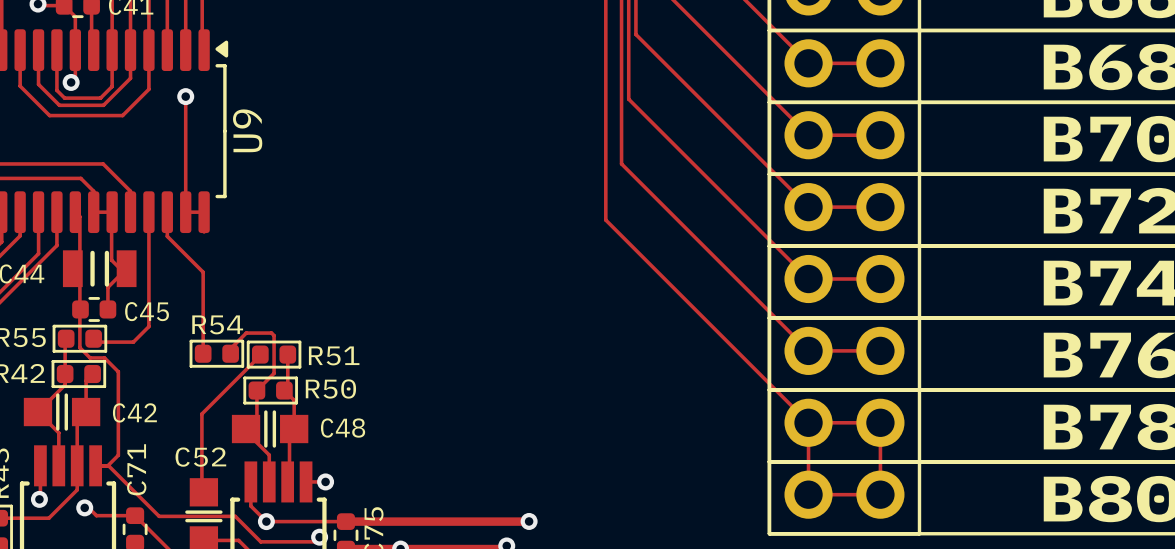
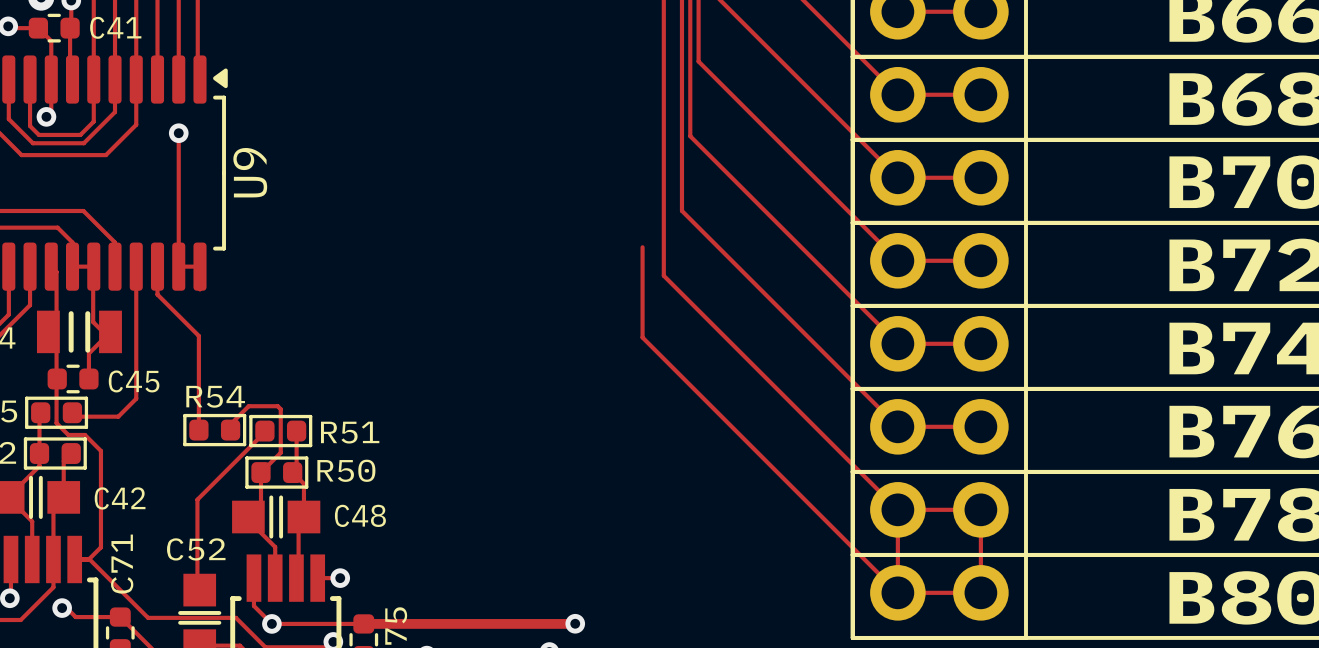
track: none -> (642, 247) (642, 337) (897, 592)

